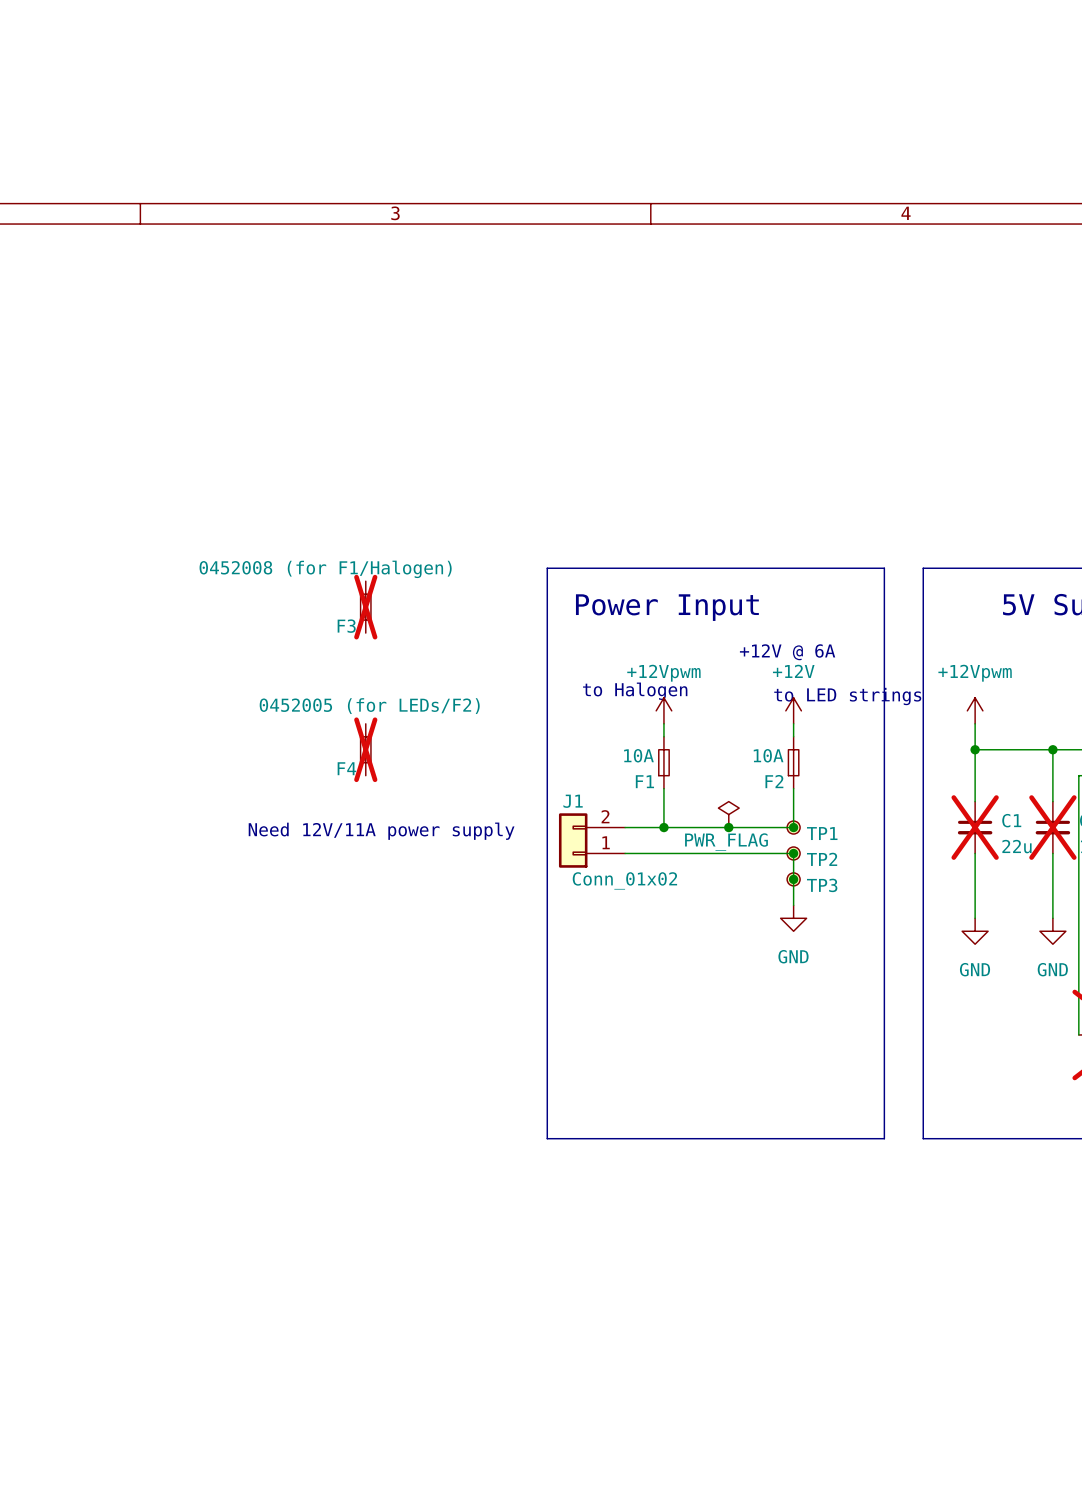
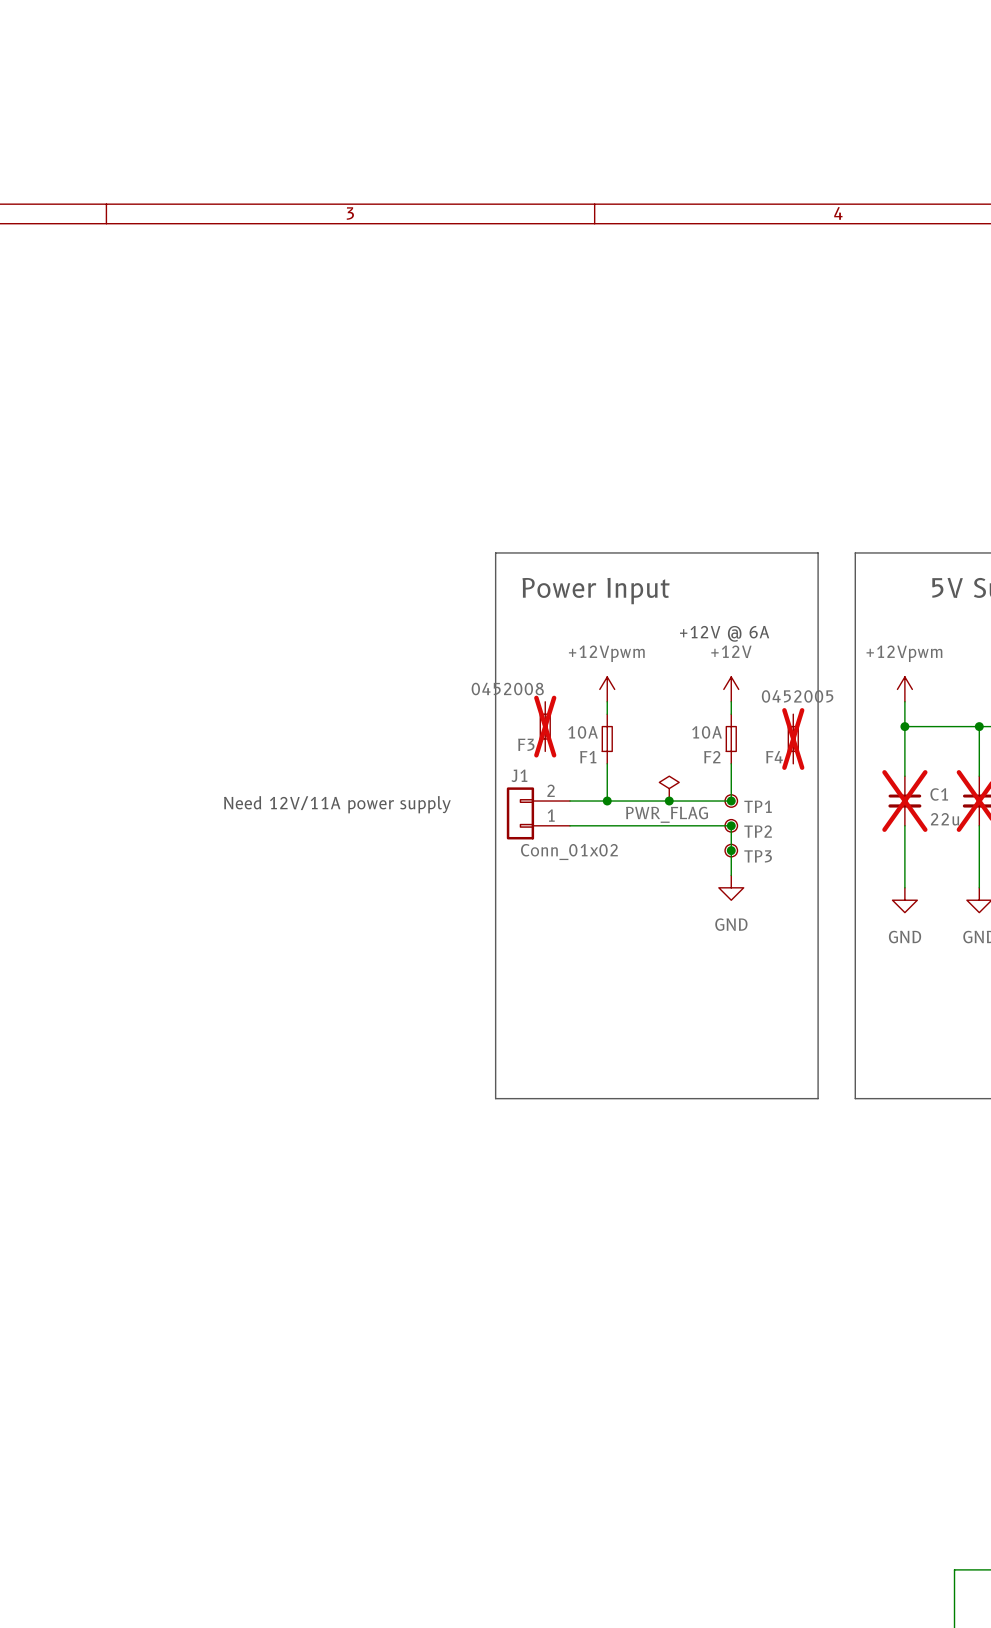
F3 value: 0452008 (for F1/Halogen) (325, 569) -> 0452008 (507, 689)
F3 position: (365, 607) -> (545, 726)
text: to Halogen (635, 691) -> none
text: to LED strings (847, 696) -> none
F4 value: 0452005 (for LEDs/F2) (369, 706) -> 0452005 (797, 696)
F4 position: (365, 749) -> (793, 739)

